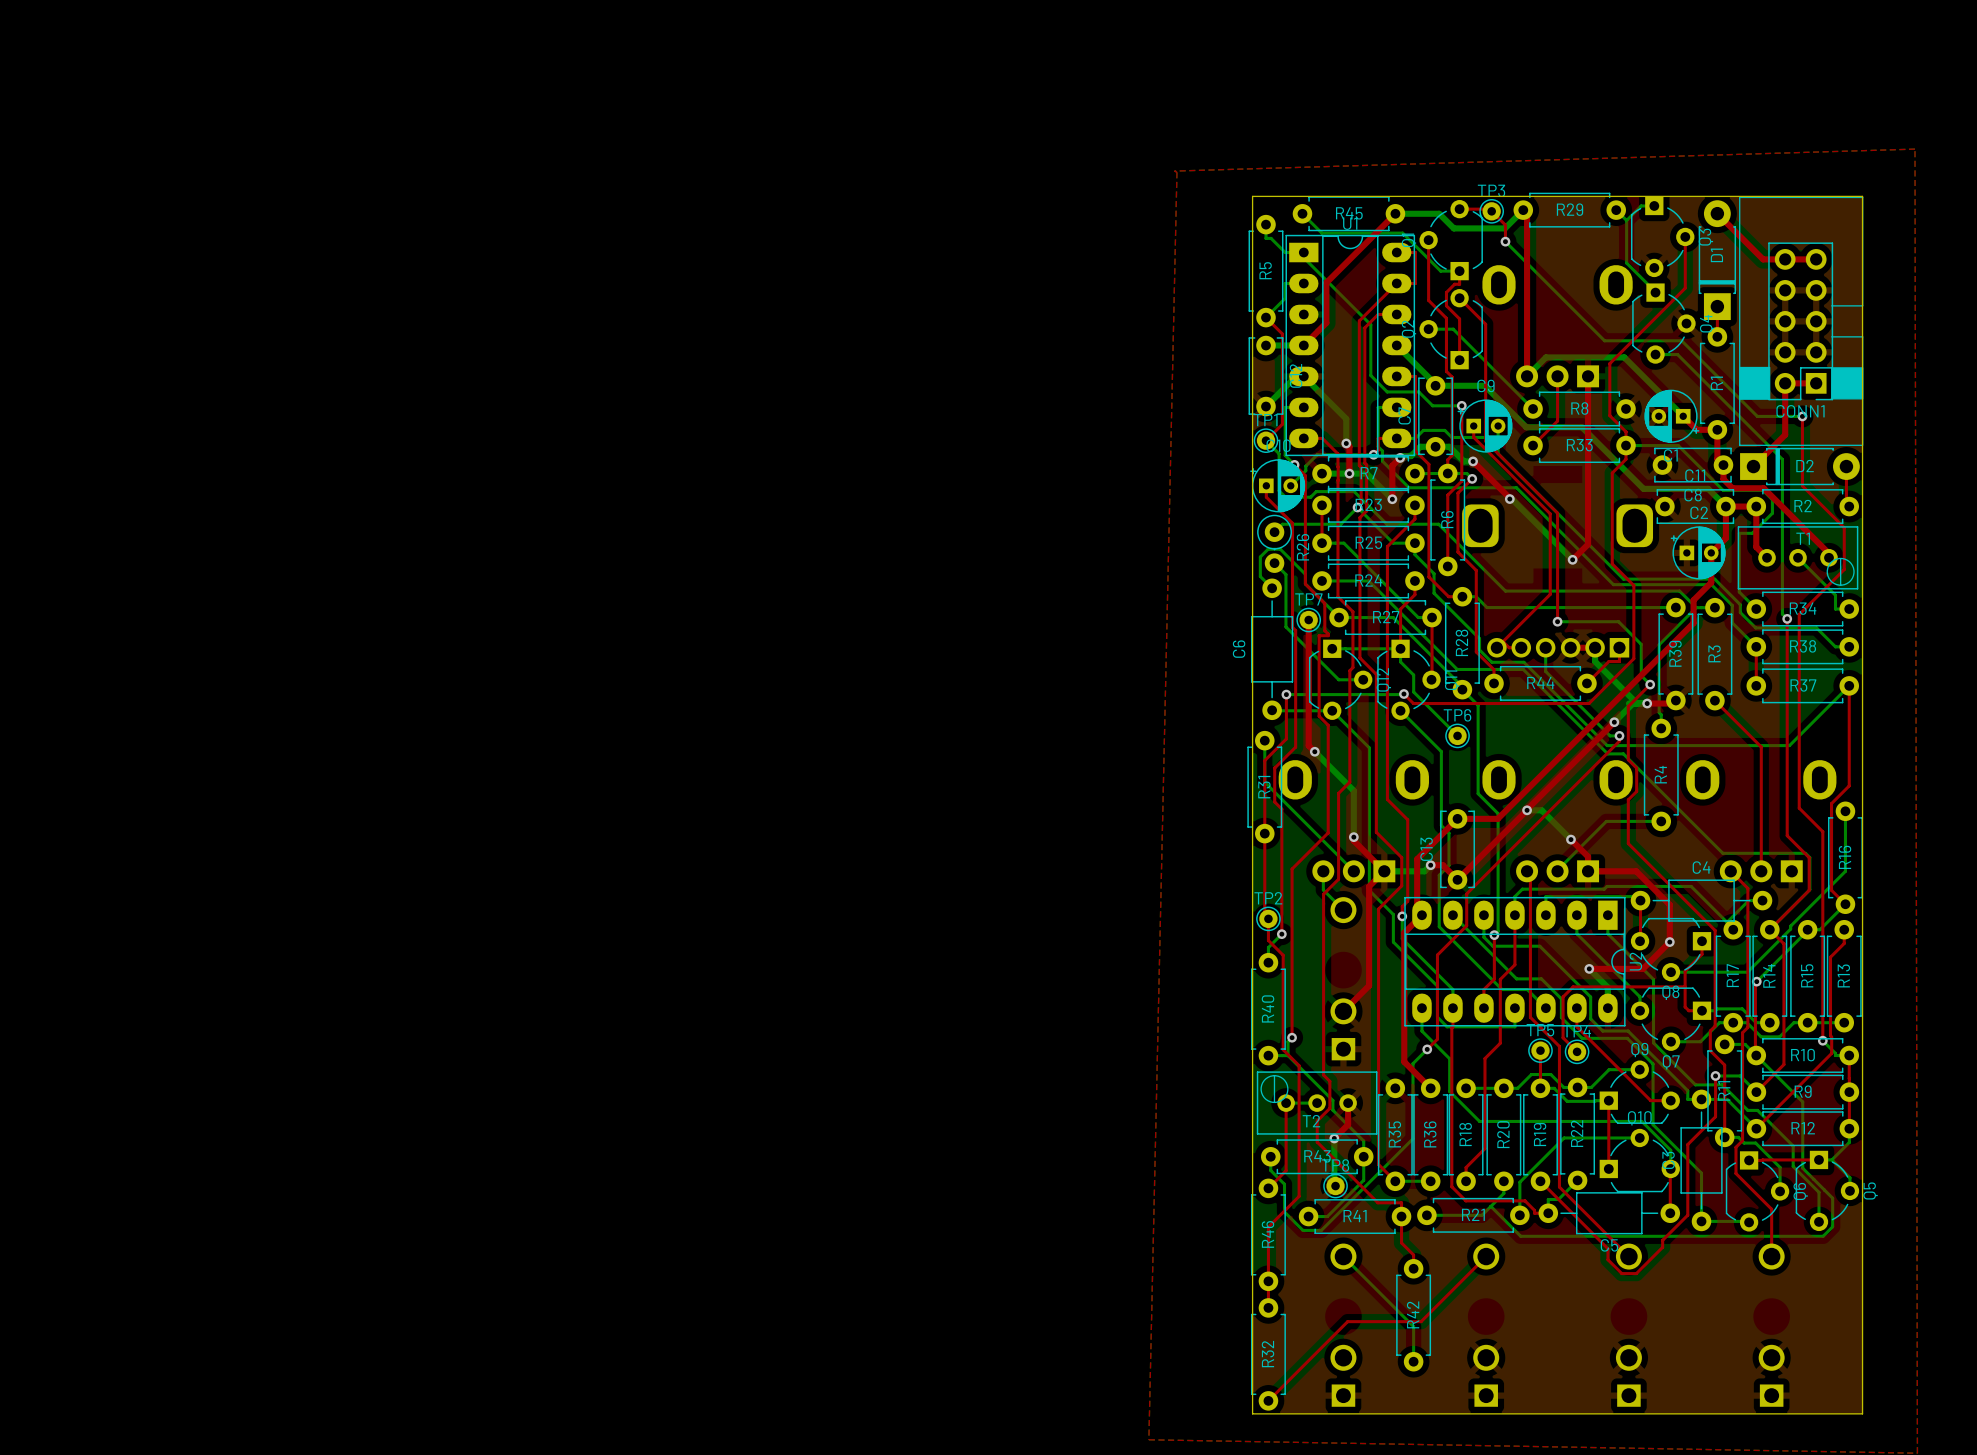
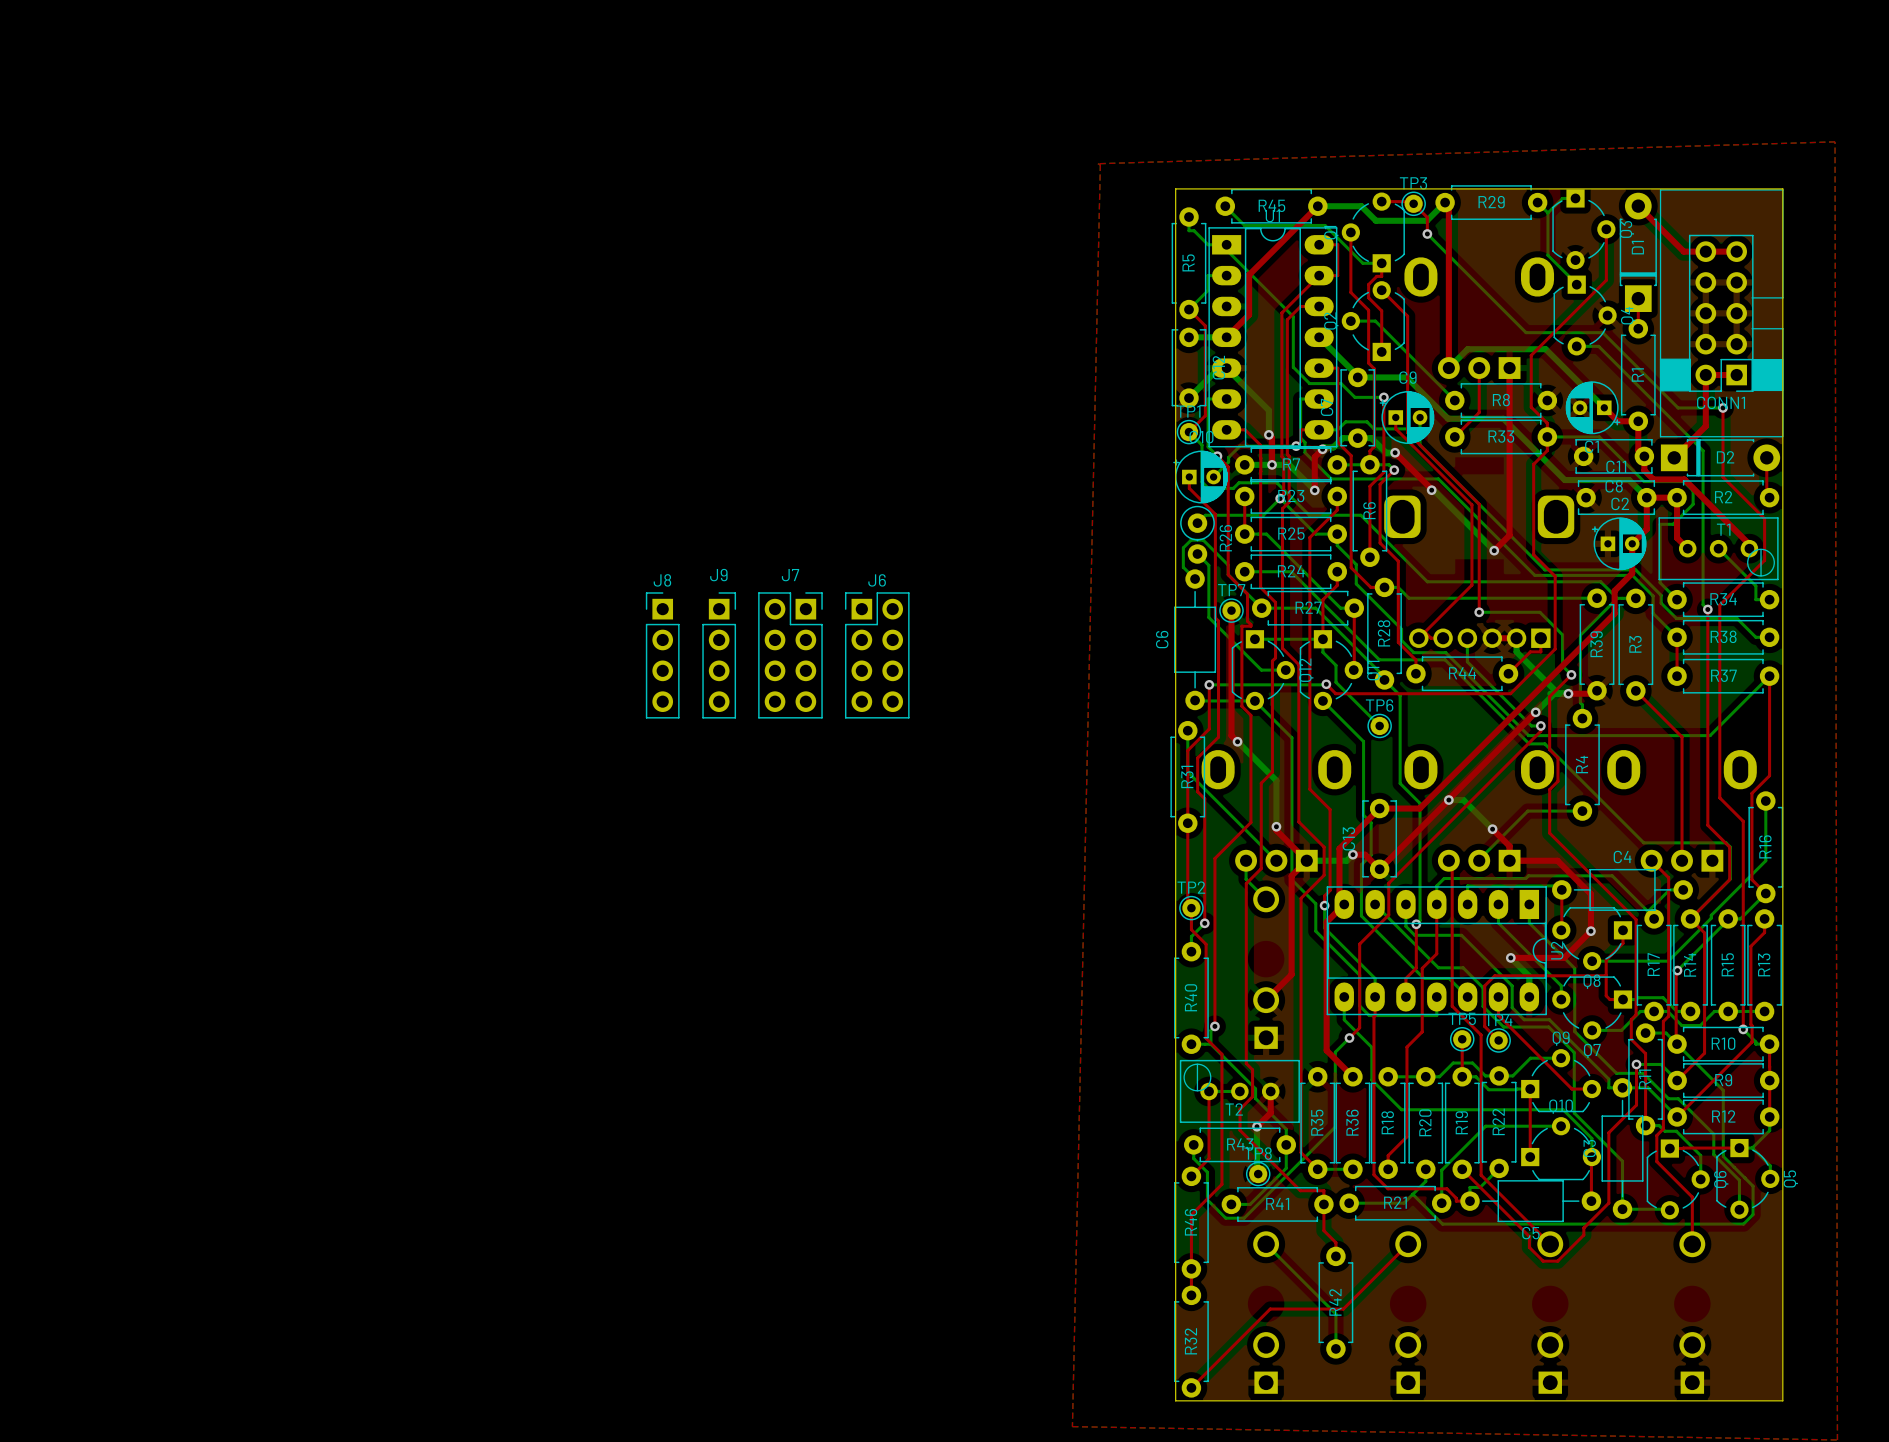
J8: none -> (662, 655)
J9: none -> (719, 655)
J7: none -> (790, 655)
J6: none -> (877, 655)

